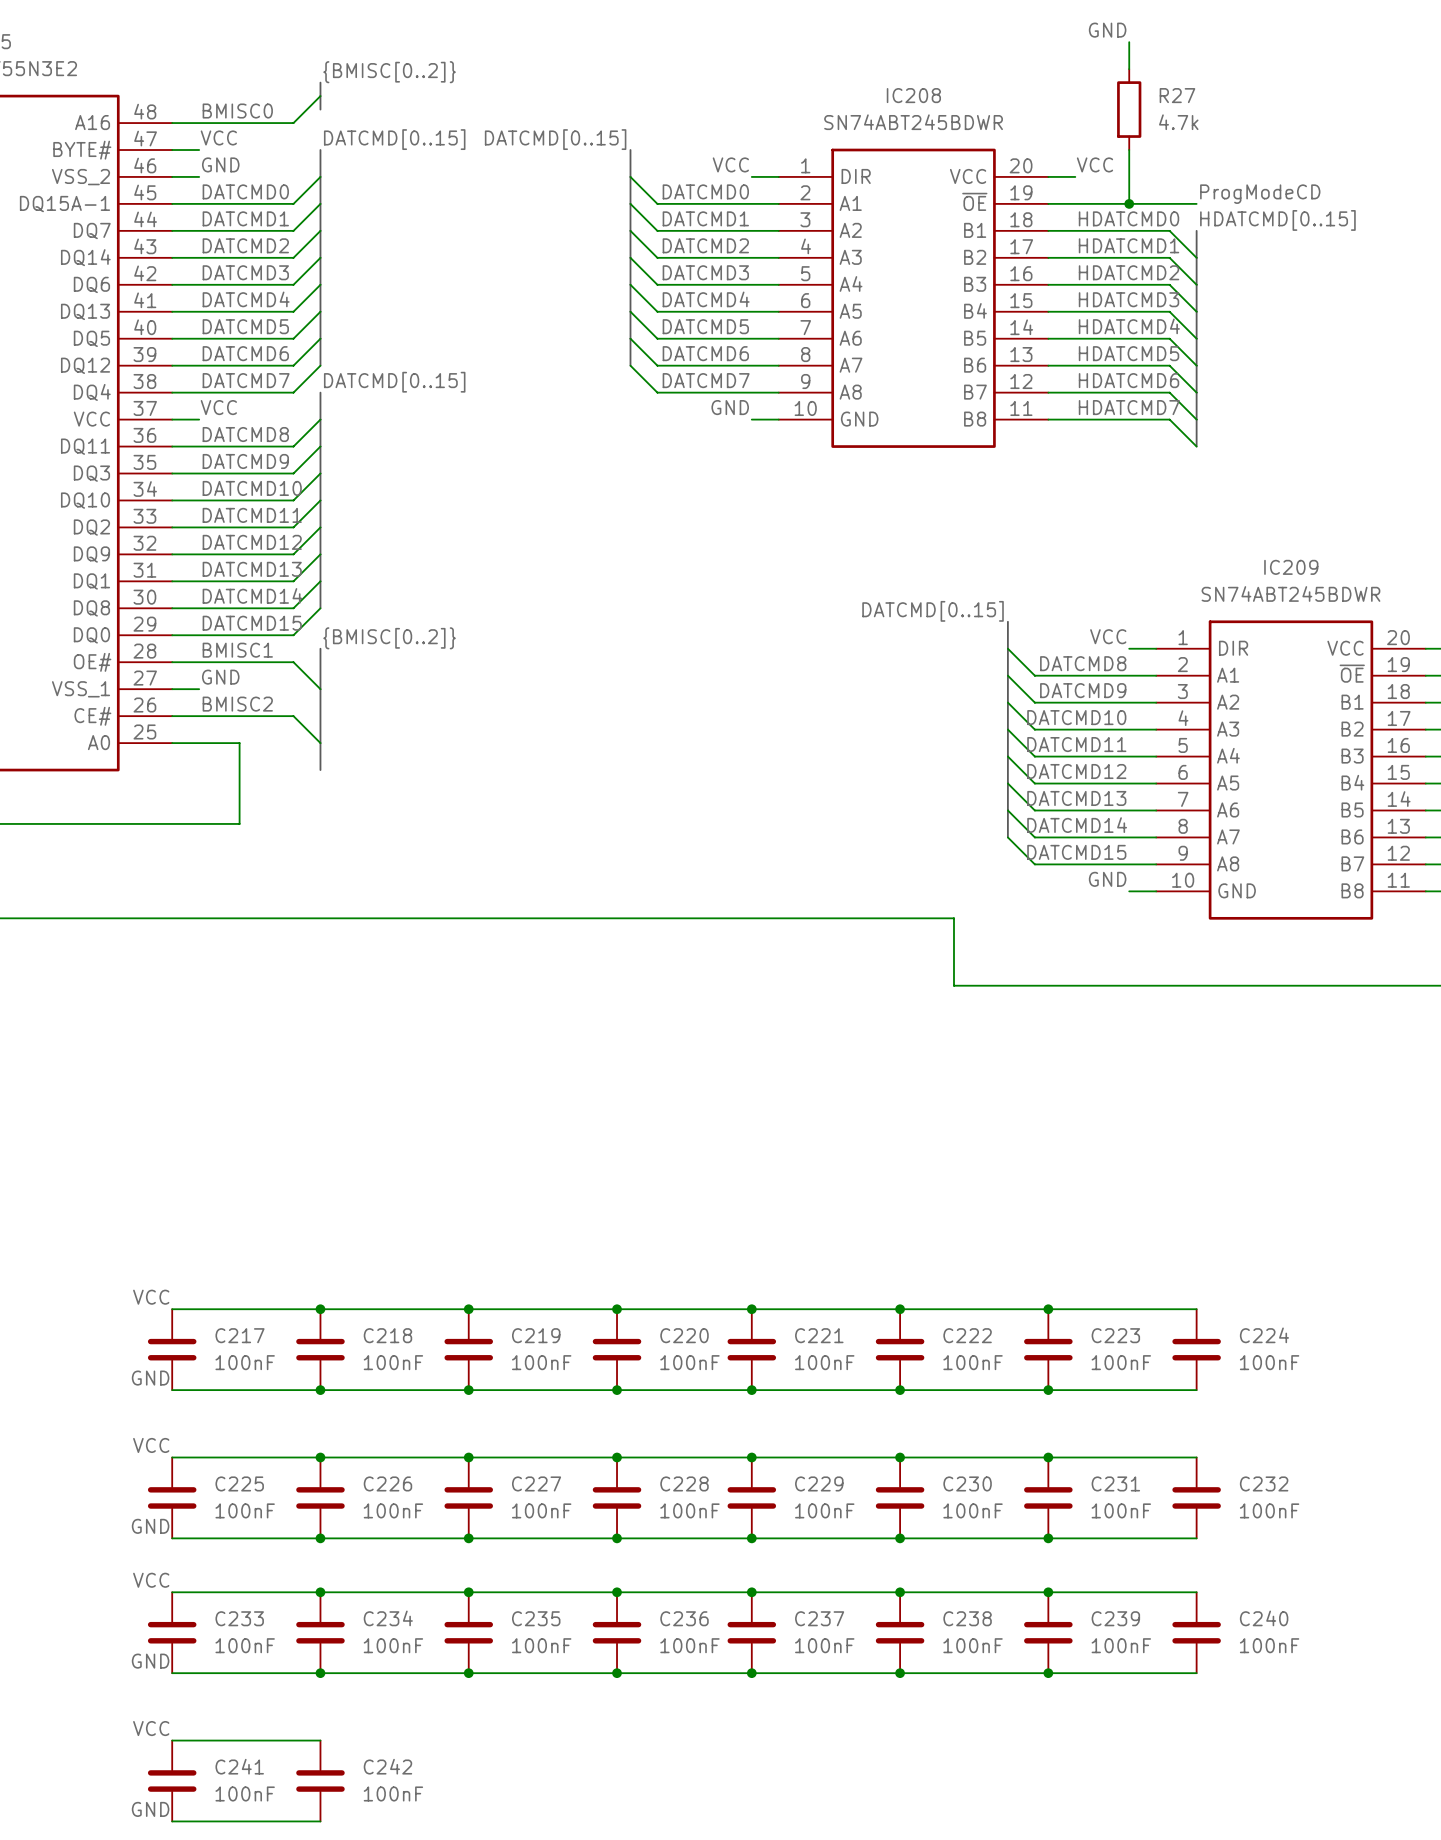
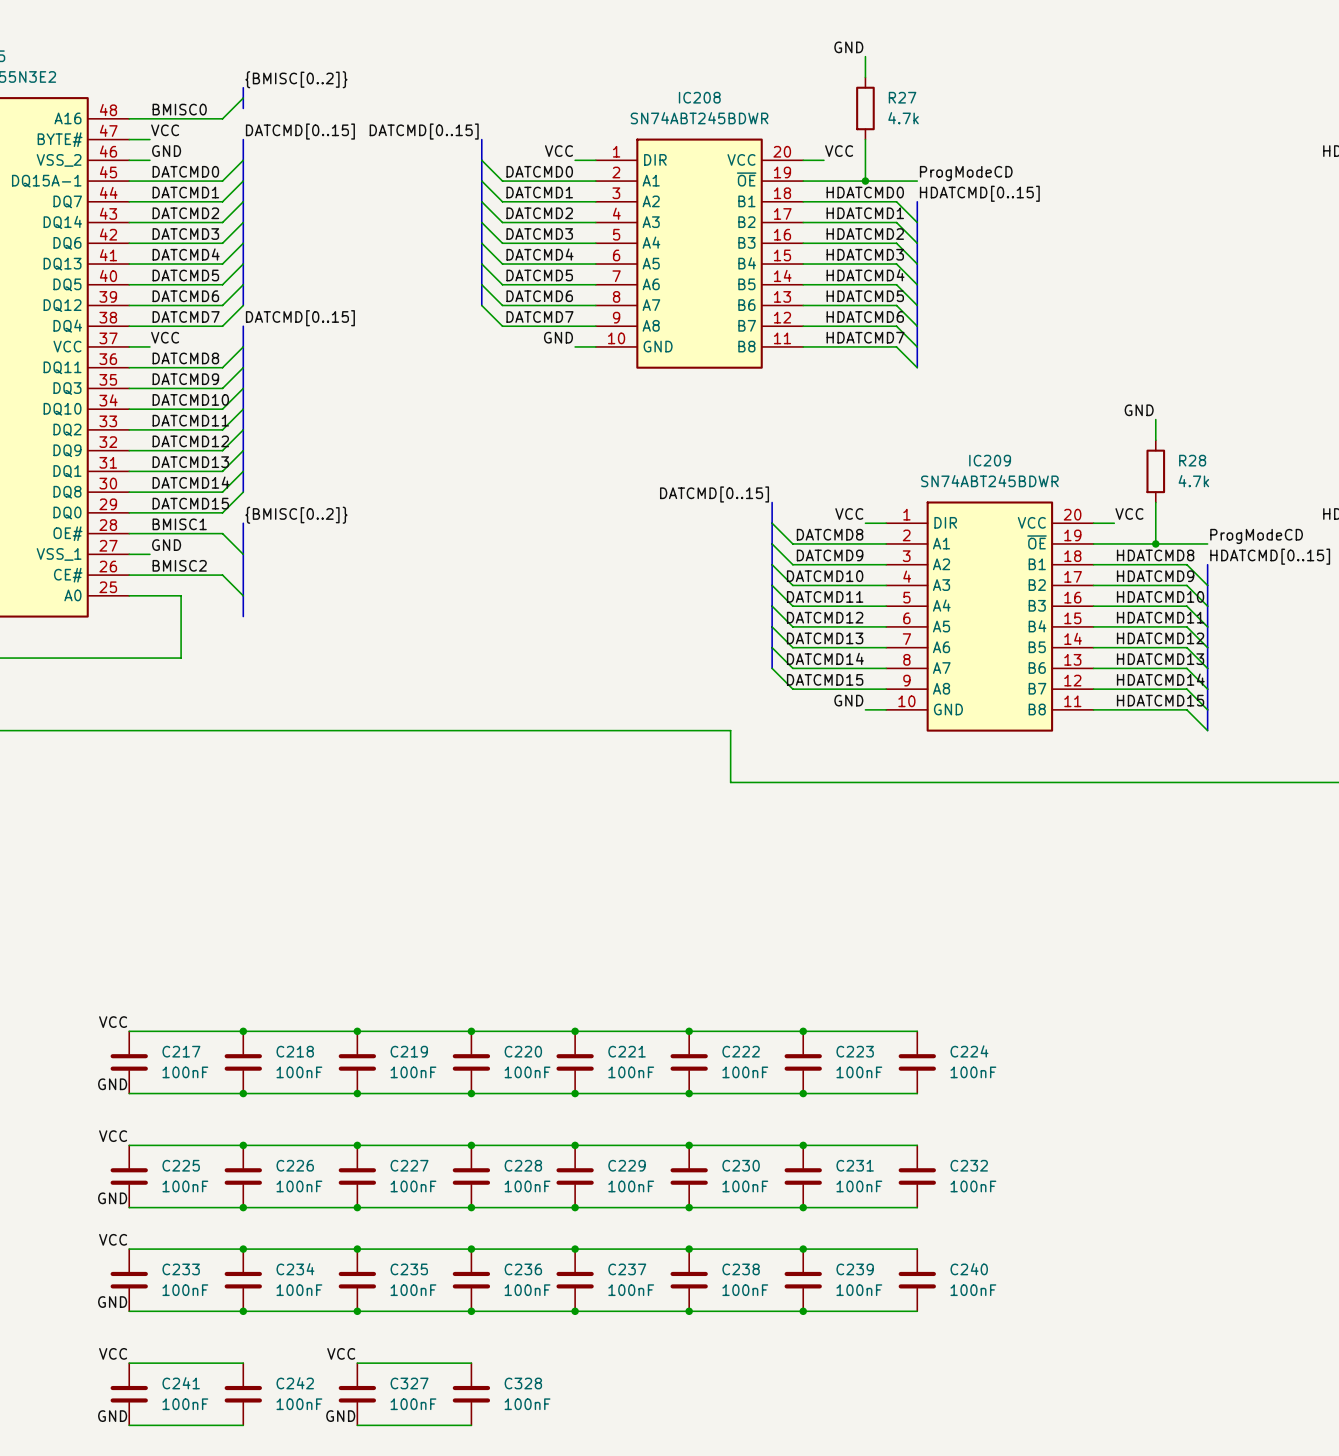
label: none -> VCC (341, 1353)
wire: none -> (357, 1363) (471, 1363)
C327: none -> 100nF (357, 1394)
C328: none -> 100nF (471, 1394)
label: none -> GND (340, 1416)
wire: none -> (357, 1425) (471, 1425)

